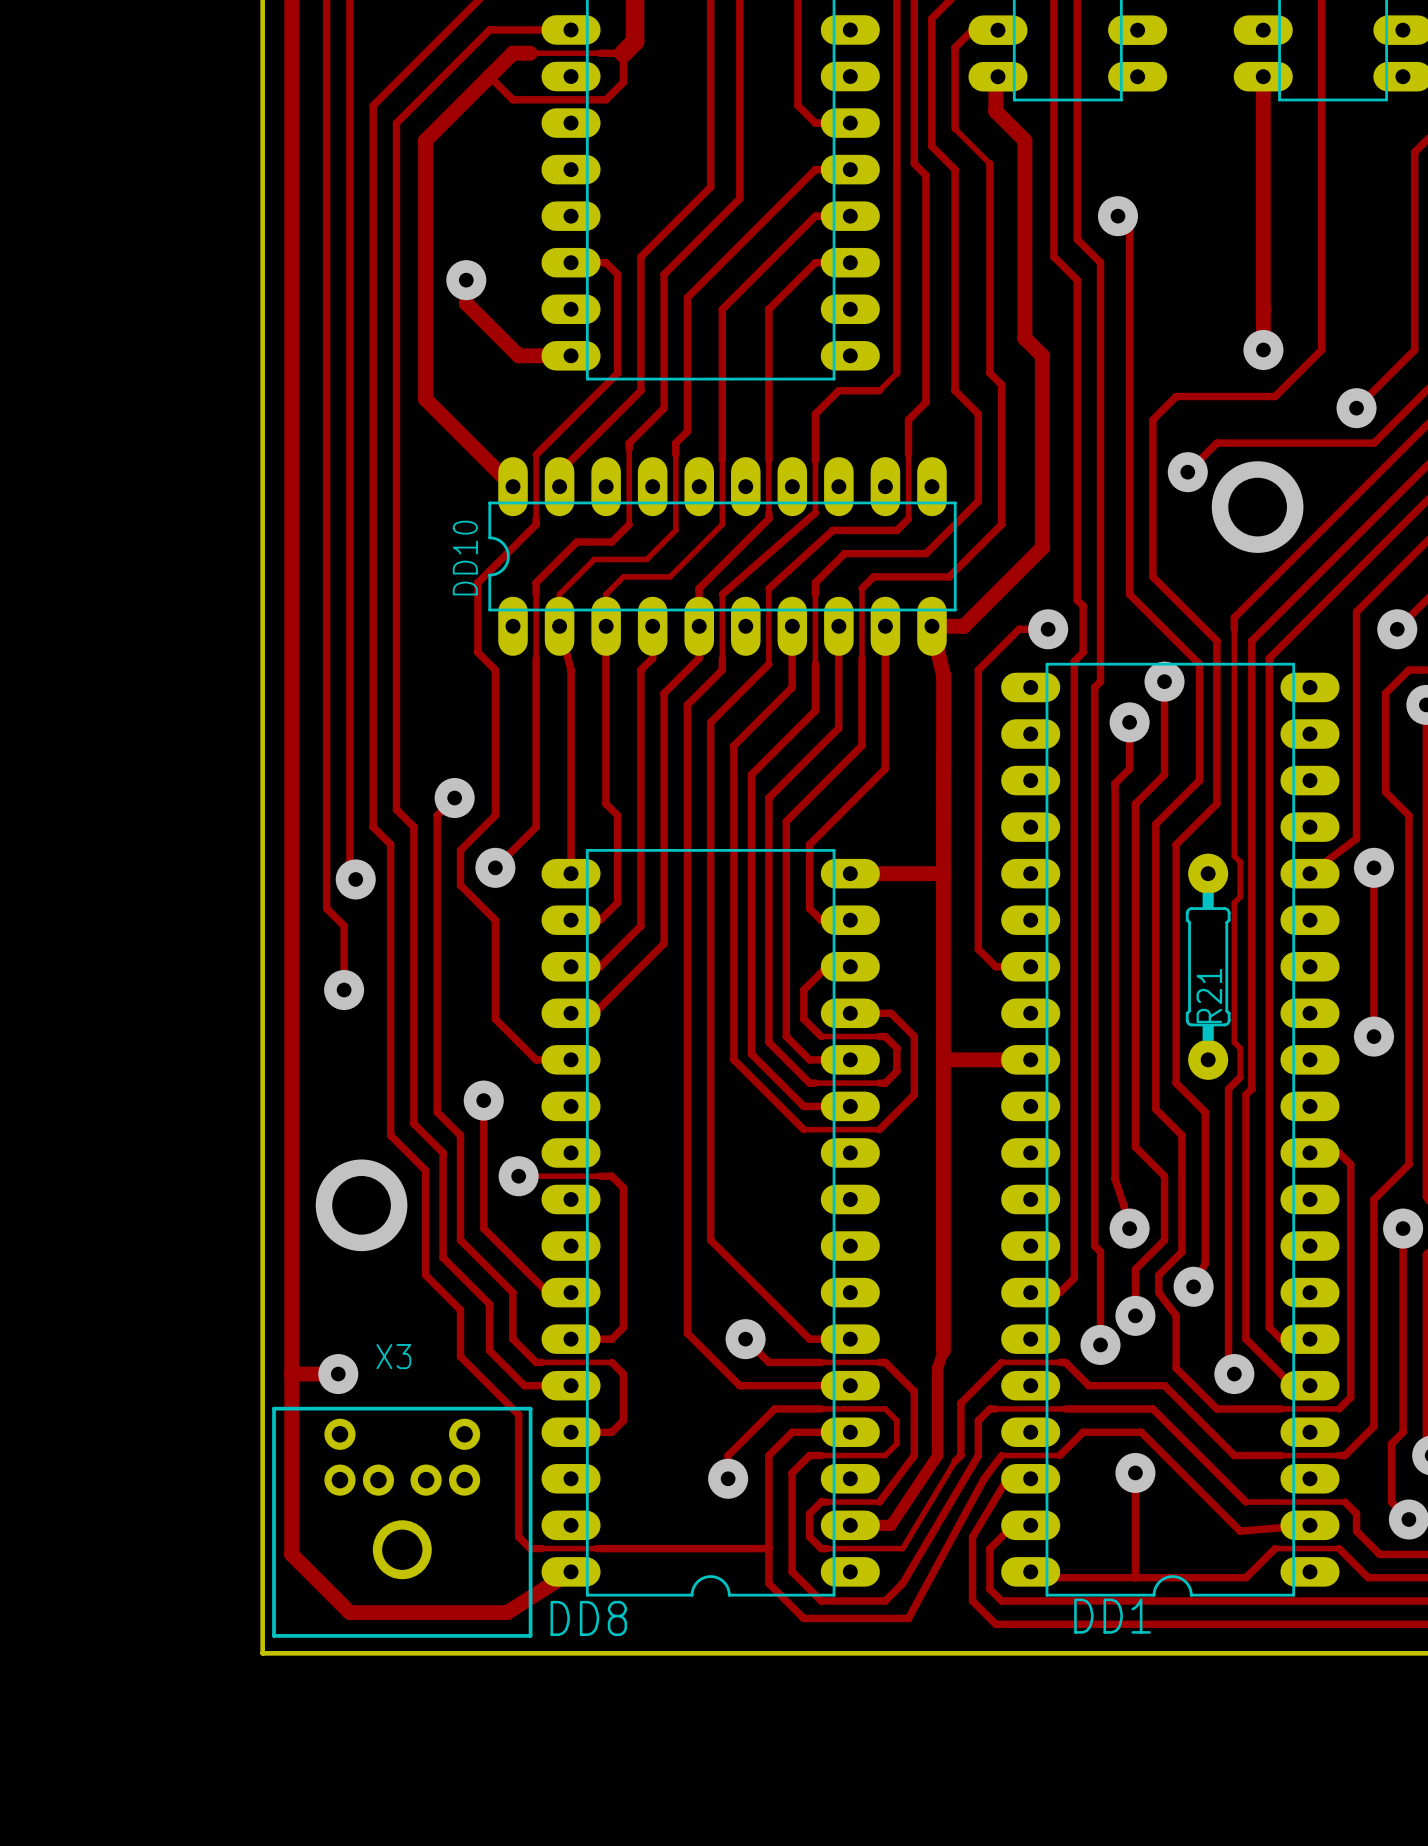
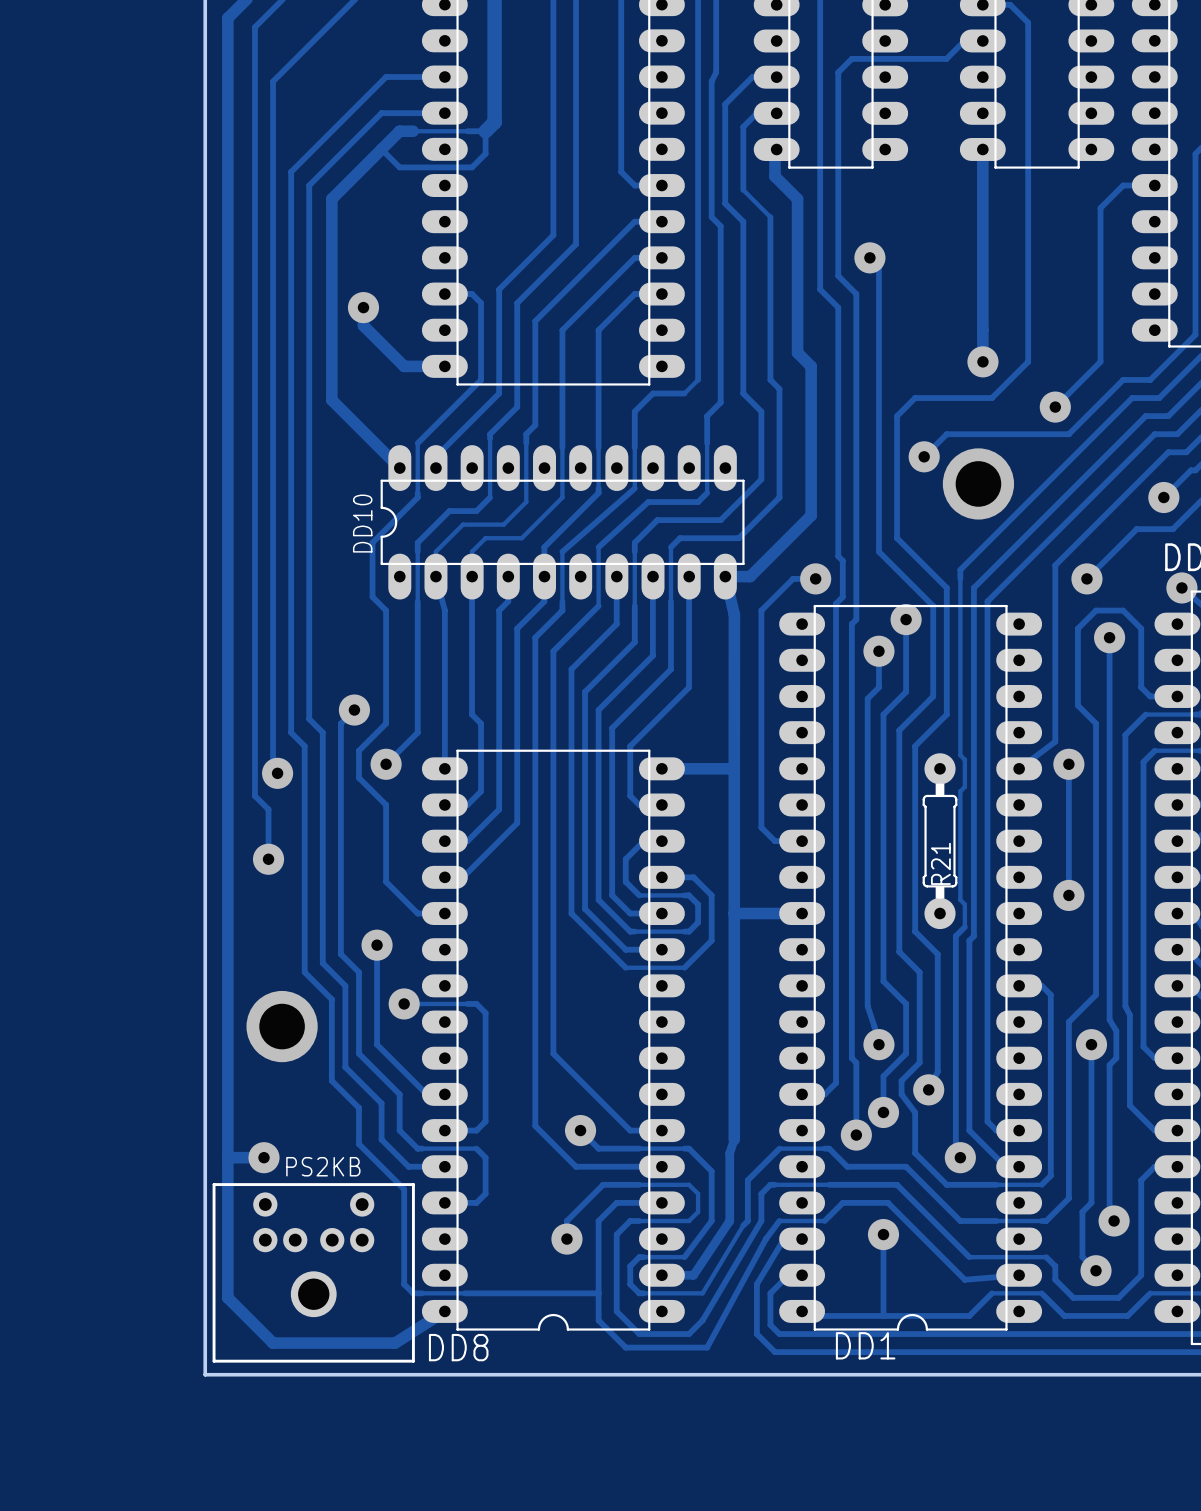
X3 name: X3 (393, 1356) -> PS2KB (323, 1166)

